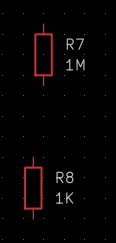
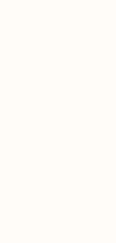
R7: 1M (43, 54) -> none
R8: 1K (33, 188) -> none

